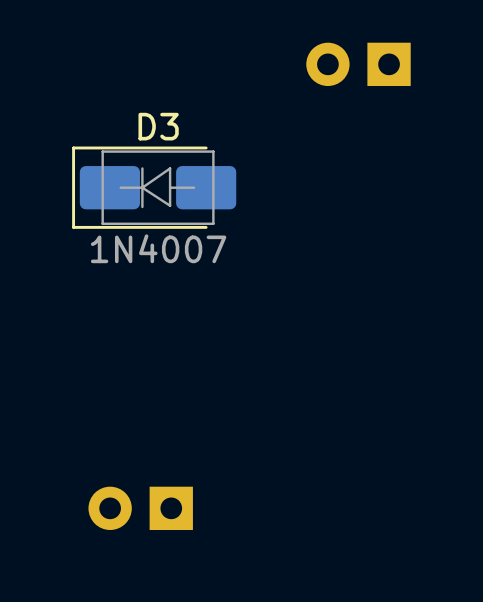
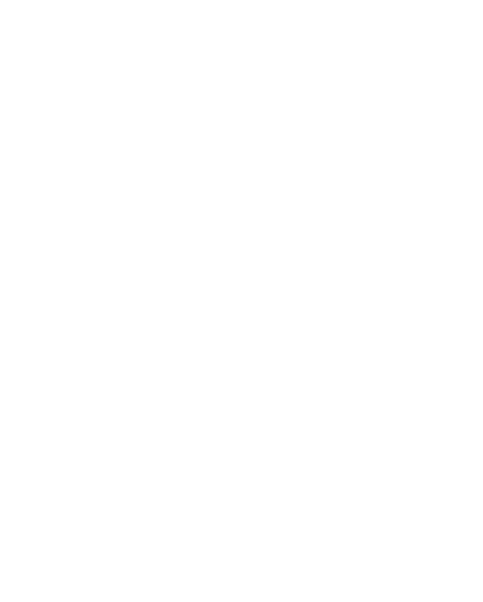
part: (358, 64) -> none
D3: 1N4007 (154, 187) -> none
part: (140, 508) -> none

